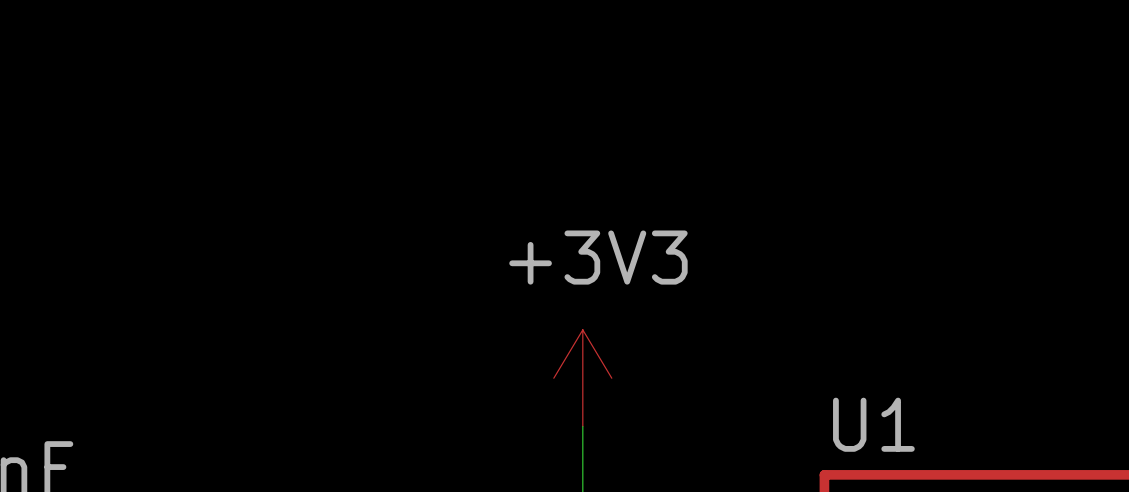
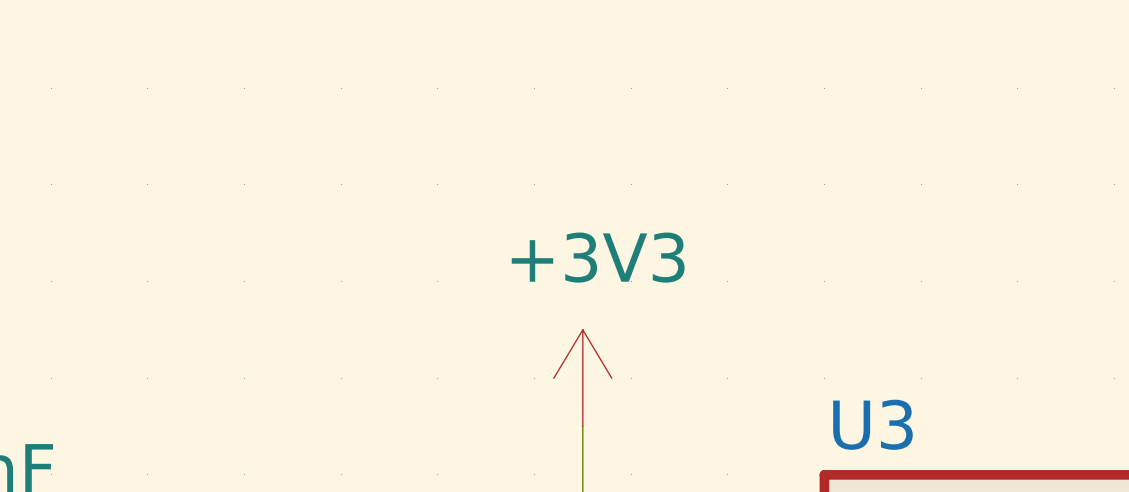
U1 name: U1 (873, 424) -> U3 (872, 424)

